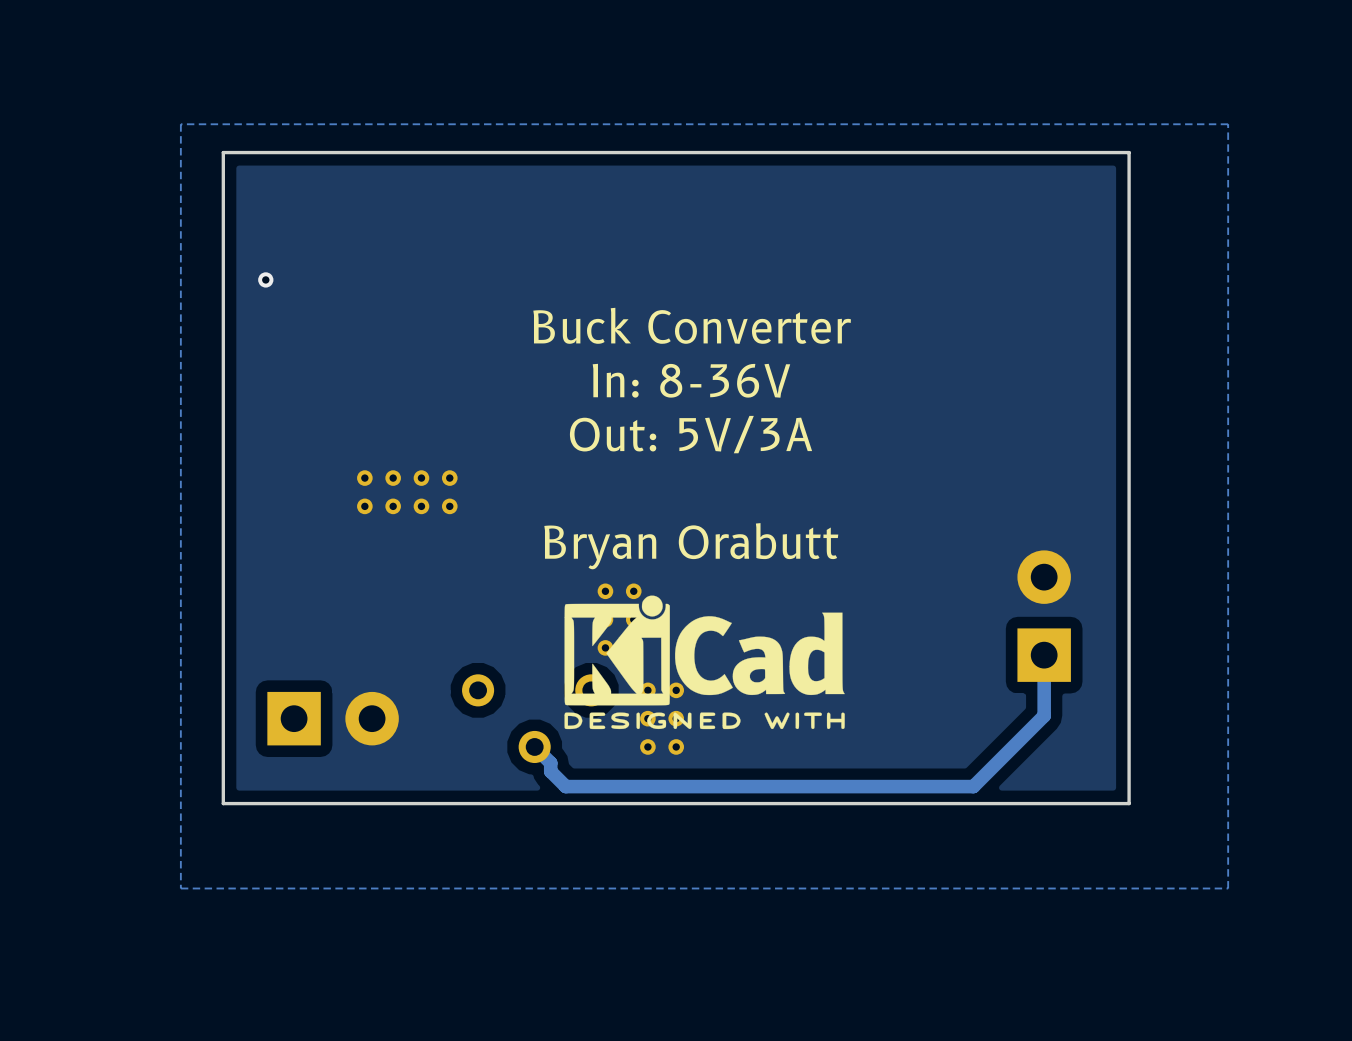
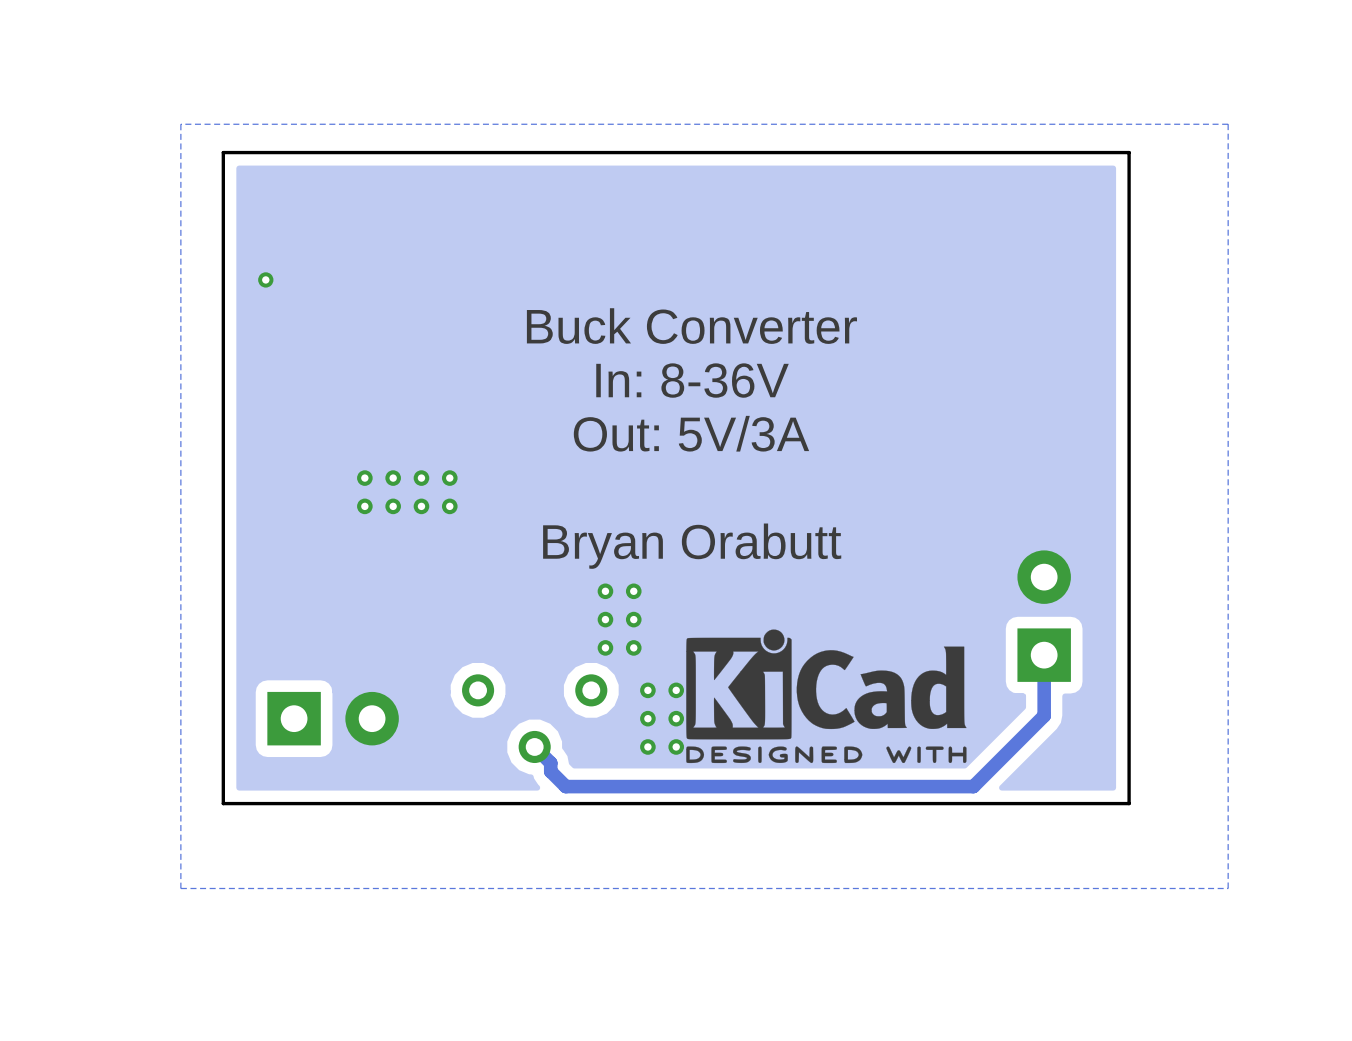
drawing position: (704, 662) -> (826, 696)

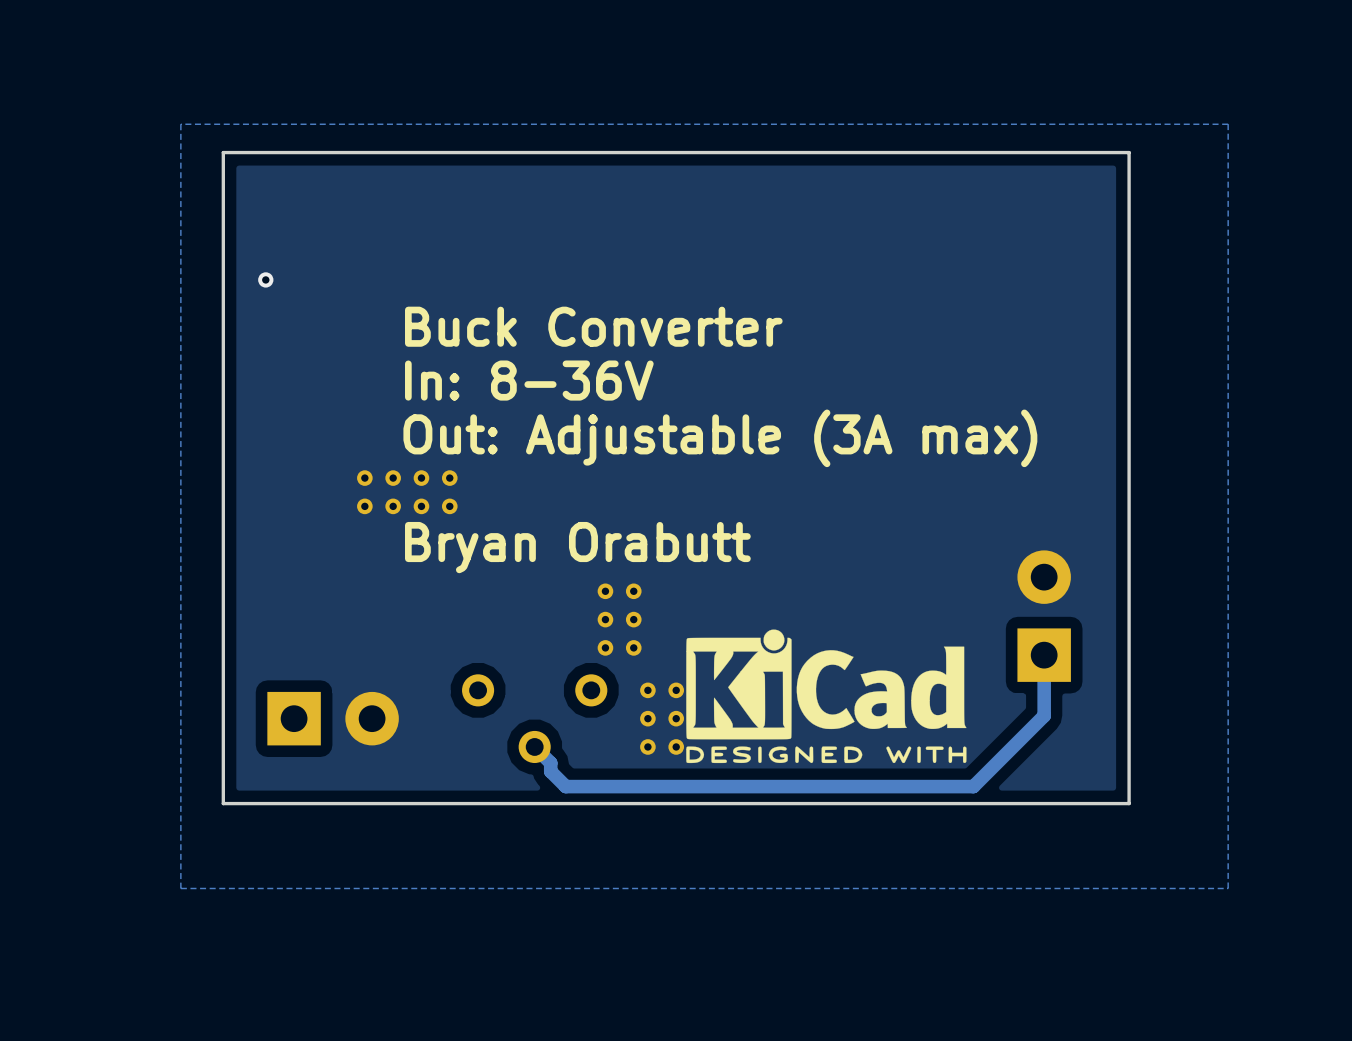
text position: Buck Converter (691, 326) -> Buck Converter (593, 326)
text position: In: 8-36V (692, 380) -> In: 8-36V (529, 380)
text: Out: 5V/3A (691, 433) -> none
text: none -> Out: Adjustable (3A max) (720, 438)
text position: Bryan Orabutt (692, 546) -> Bryan Orabutt (577, 547)

